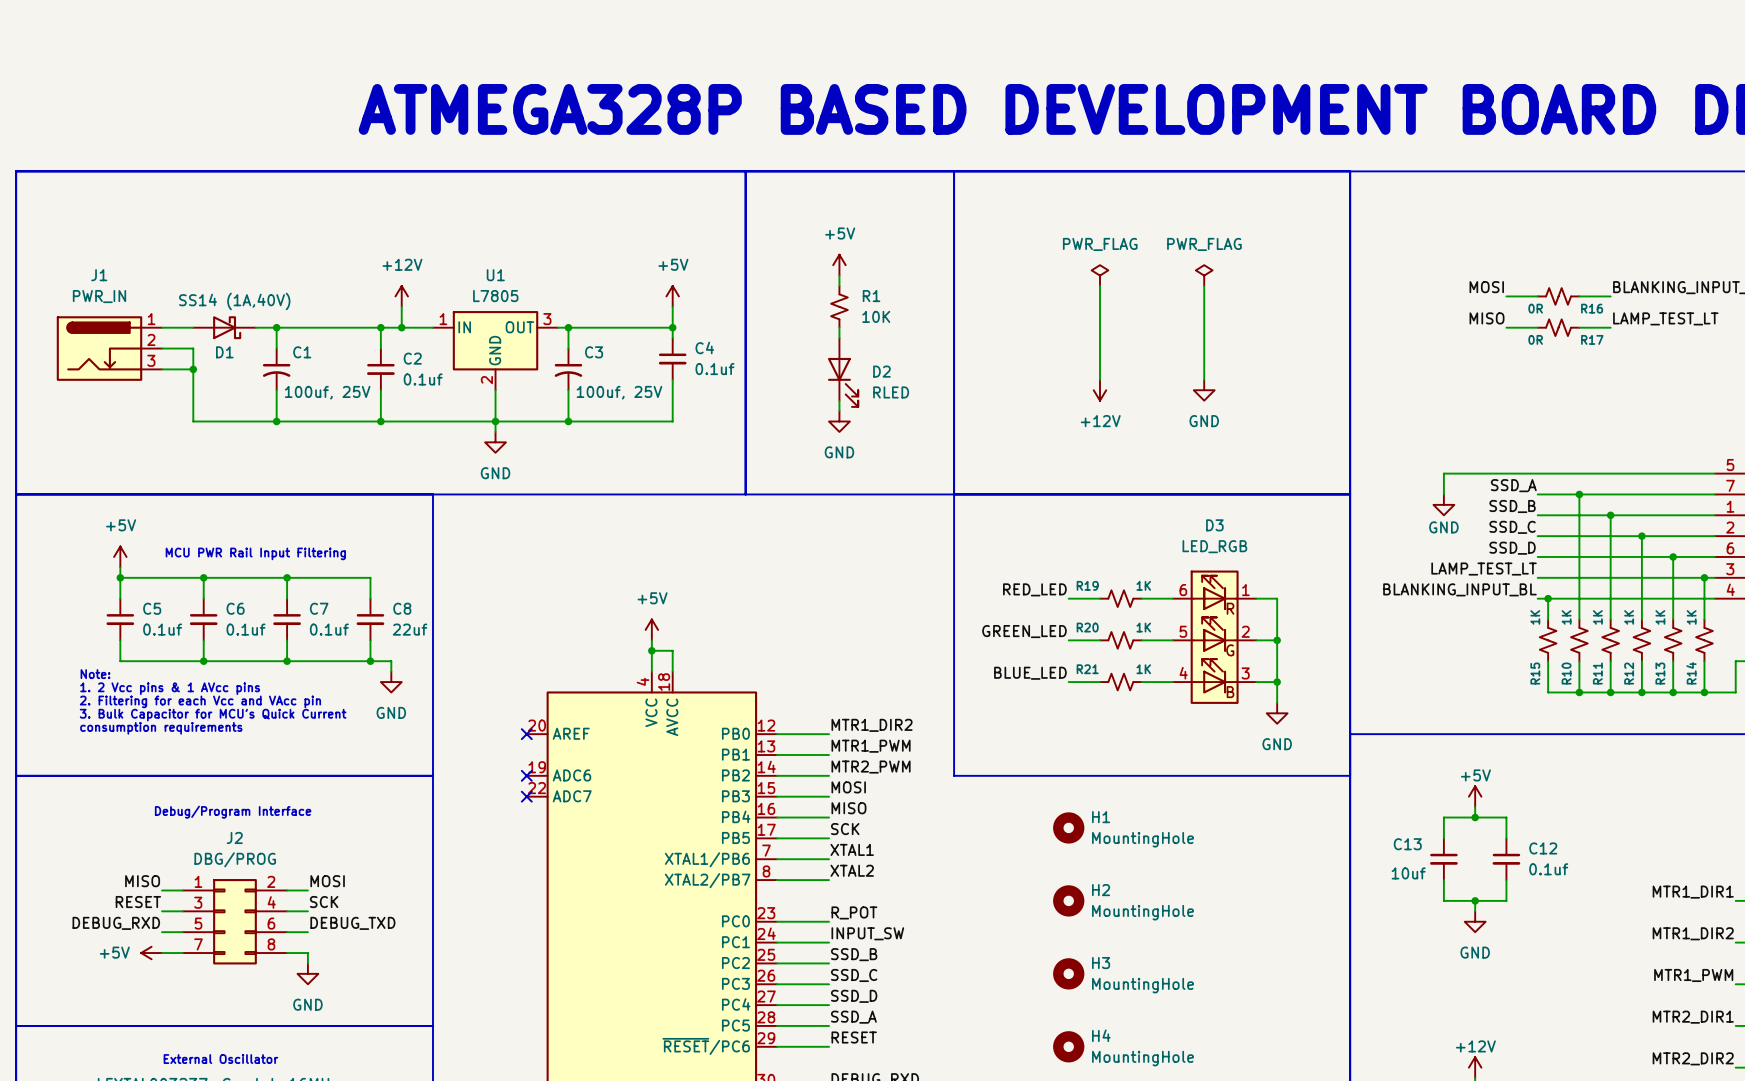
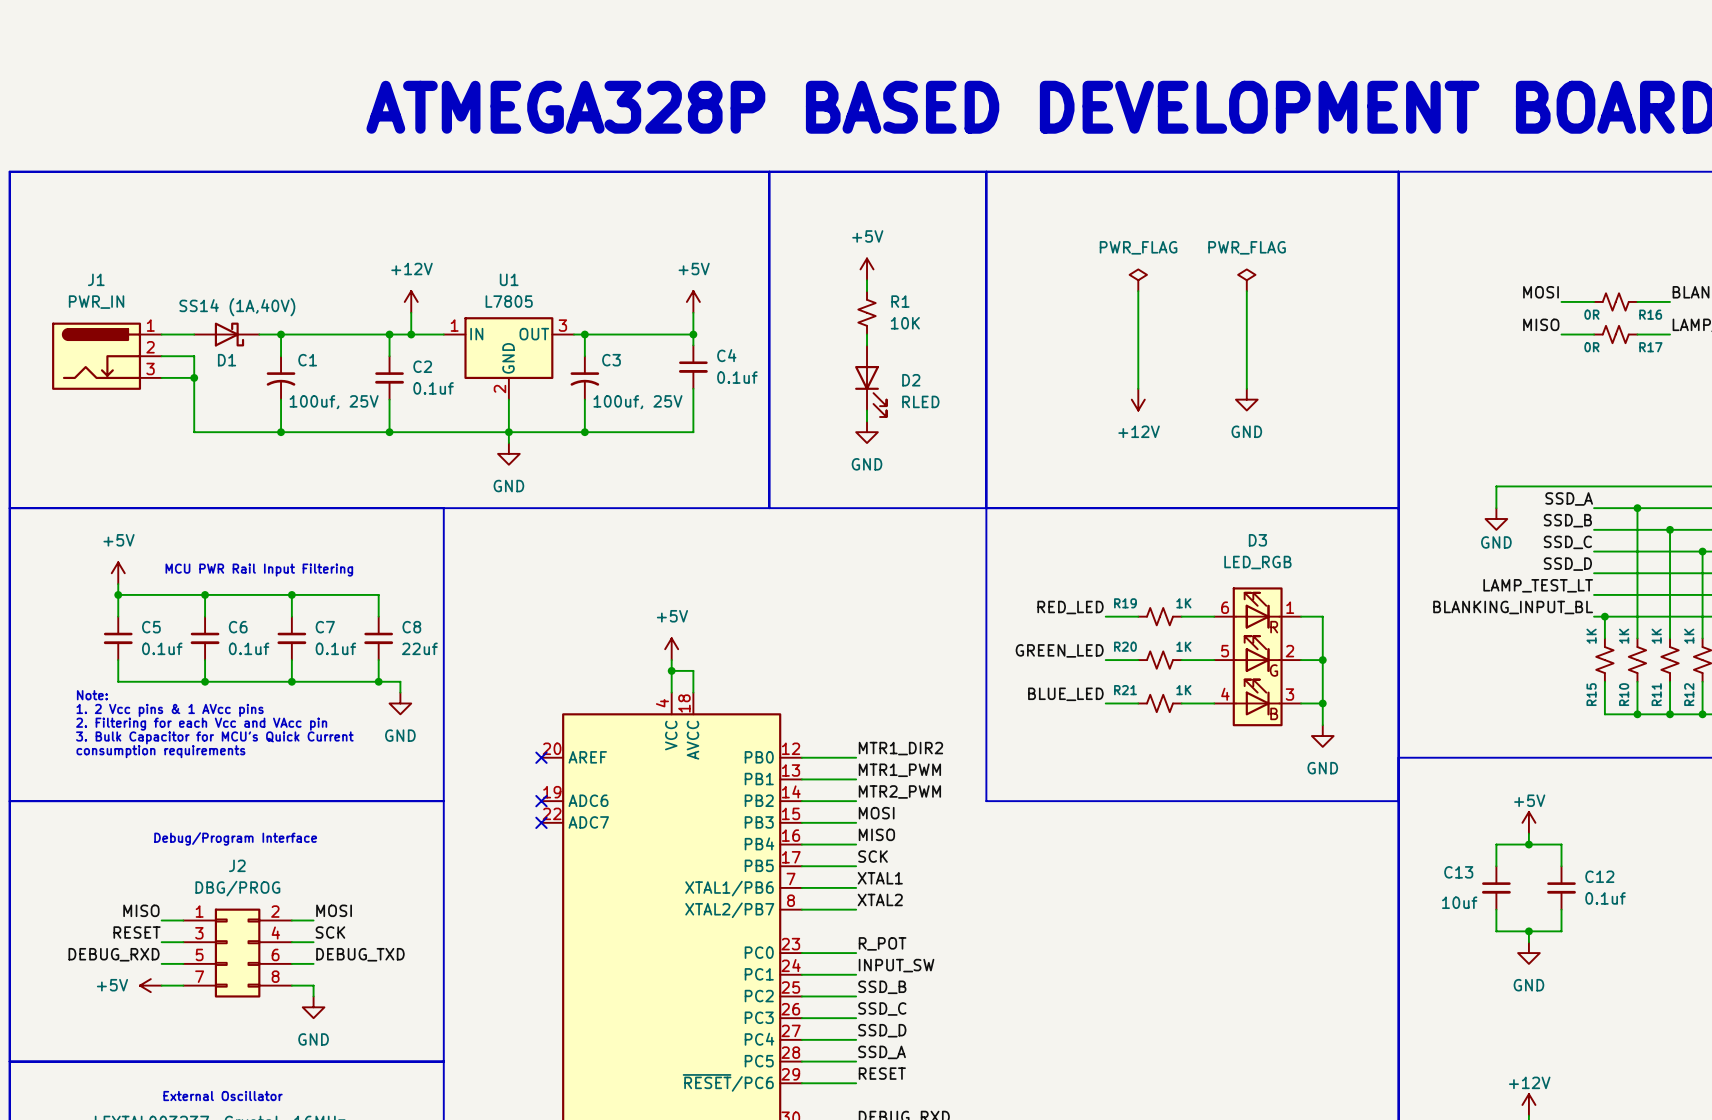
H1: MountingHole (1068, 827) -> none
H2: MountingHole (1068, 900) -> none
H3: MountingHole (1068, 973) -> none
H4: MountingHole (1068, 1046) -> none

